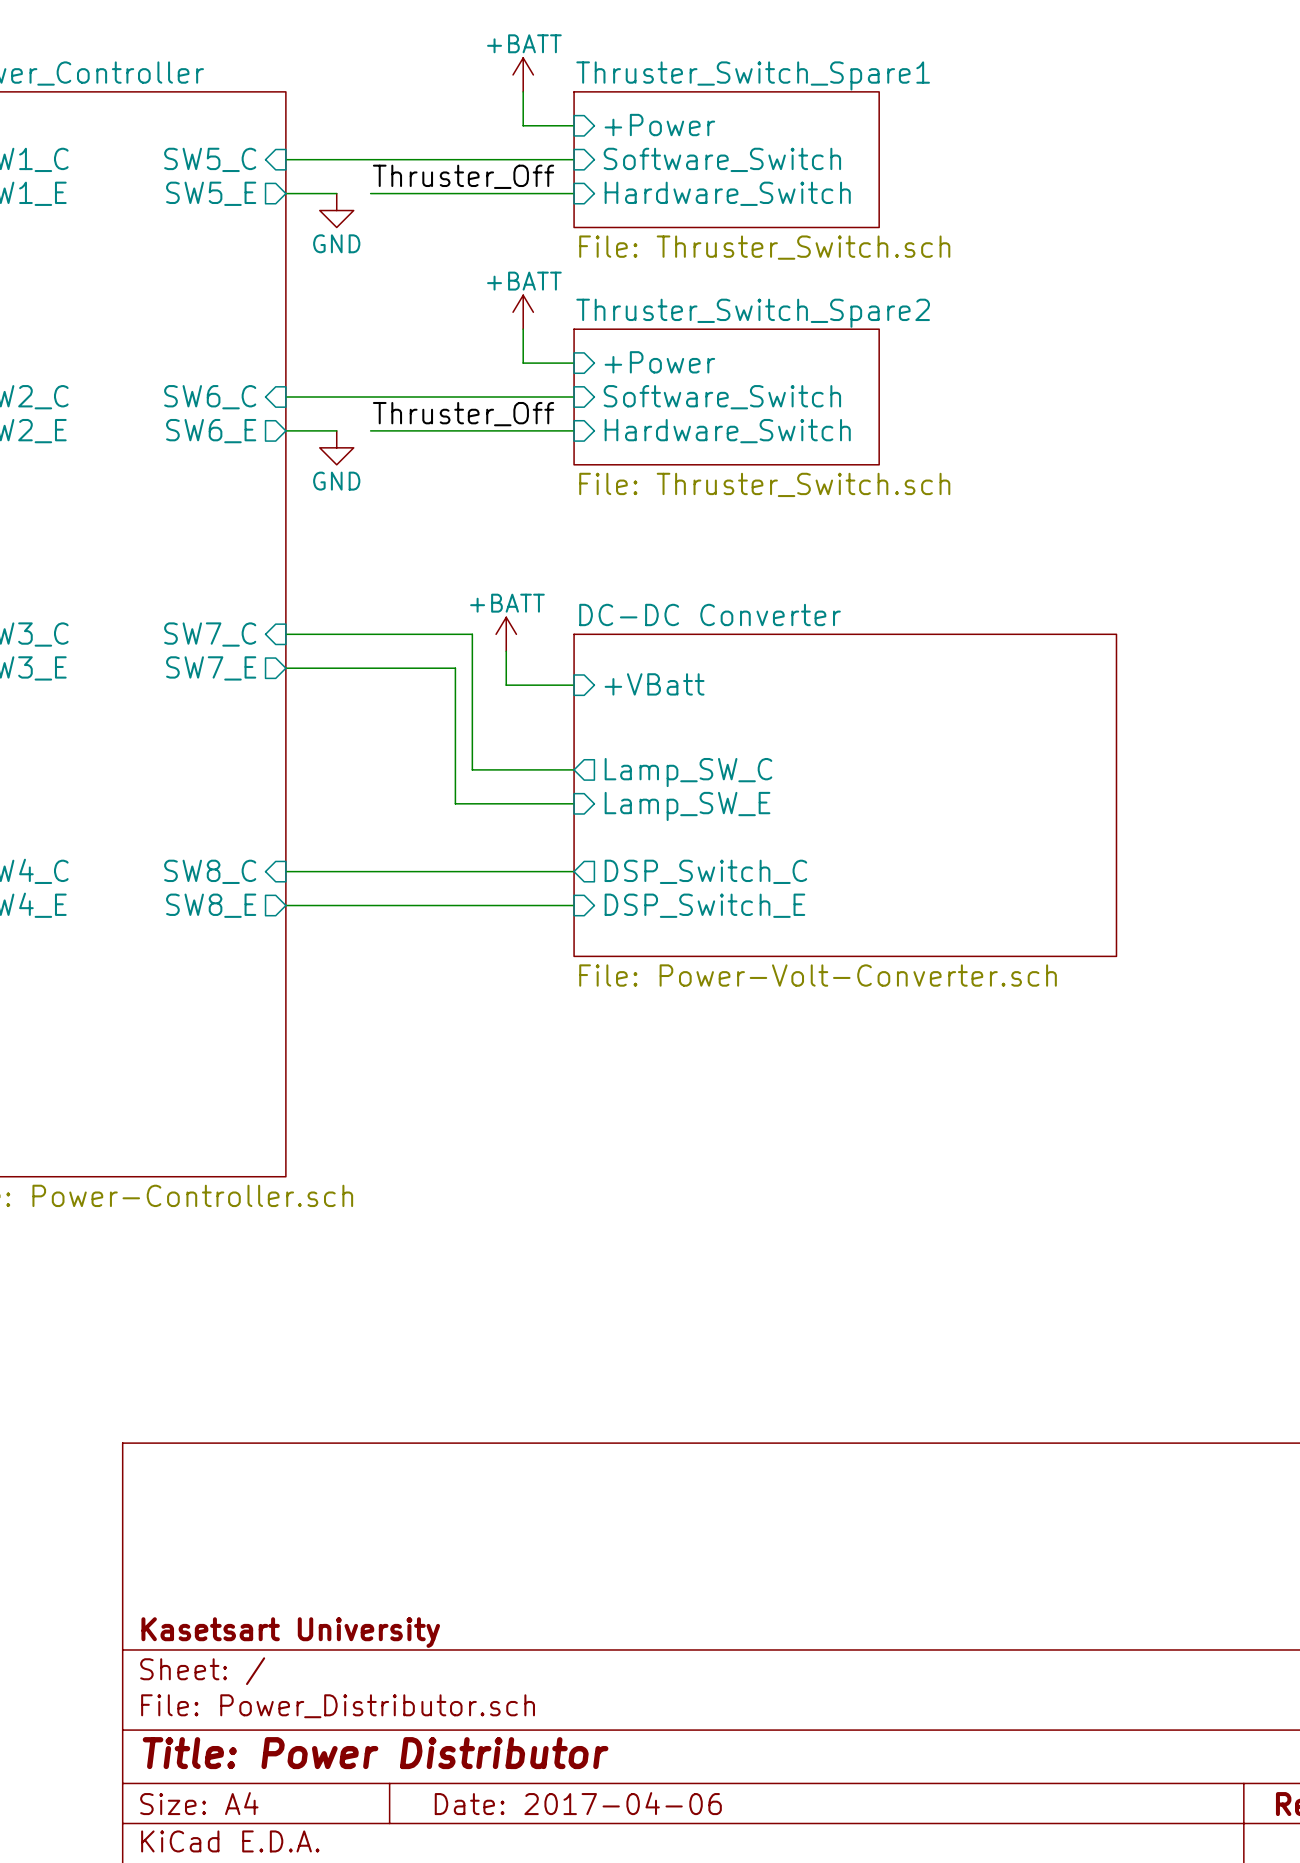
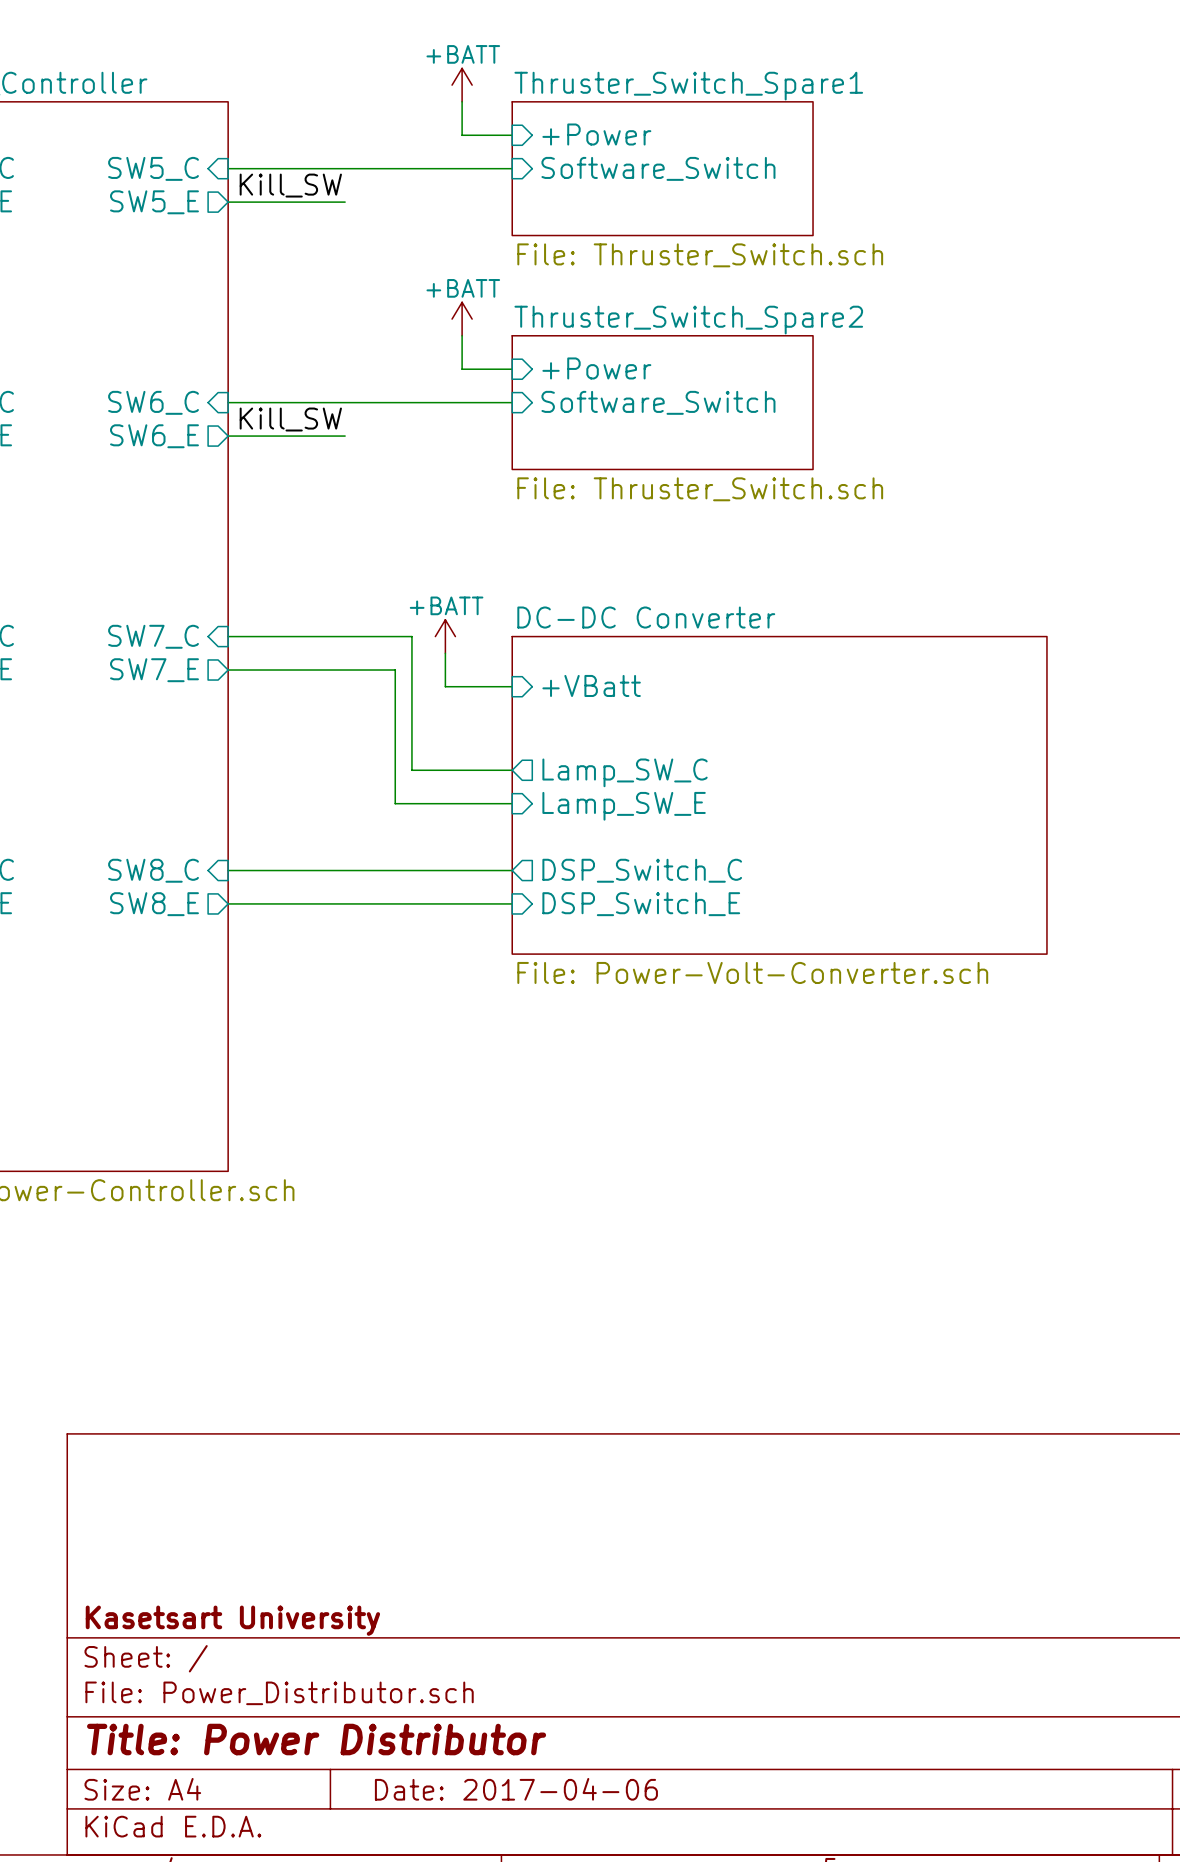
label: none -> Kill_SW (290, 185)
label: Thruster_Off (463, 176) -> none
wire: none -> (278, 202) (311, 202)
wire: (404, 193) (574, 193) -> none
sheet pin: Hardware_Switch (727, 193) -> none
power symbol: GND (336, 210) -> none
label: none -> Kill_SW (290, 419)
label: Thruster_Off (463, 414) -> none
wire: none -> (278, 436) (311, 436)
wire: (404, 430) (574, 430) -> none
sheet pin: Hardware_Switch (727, 431) -> none
power symbol: GND (336, 447) -> none

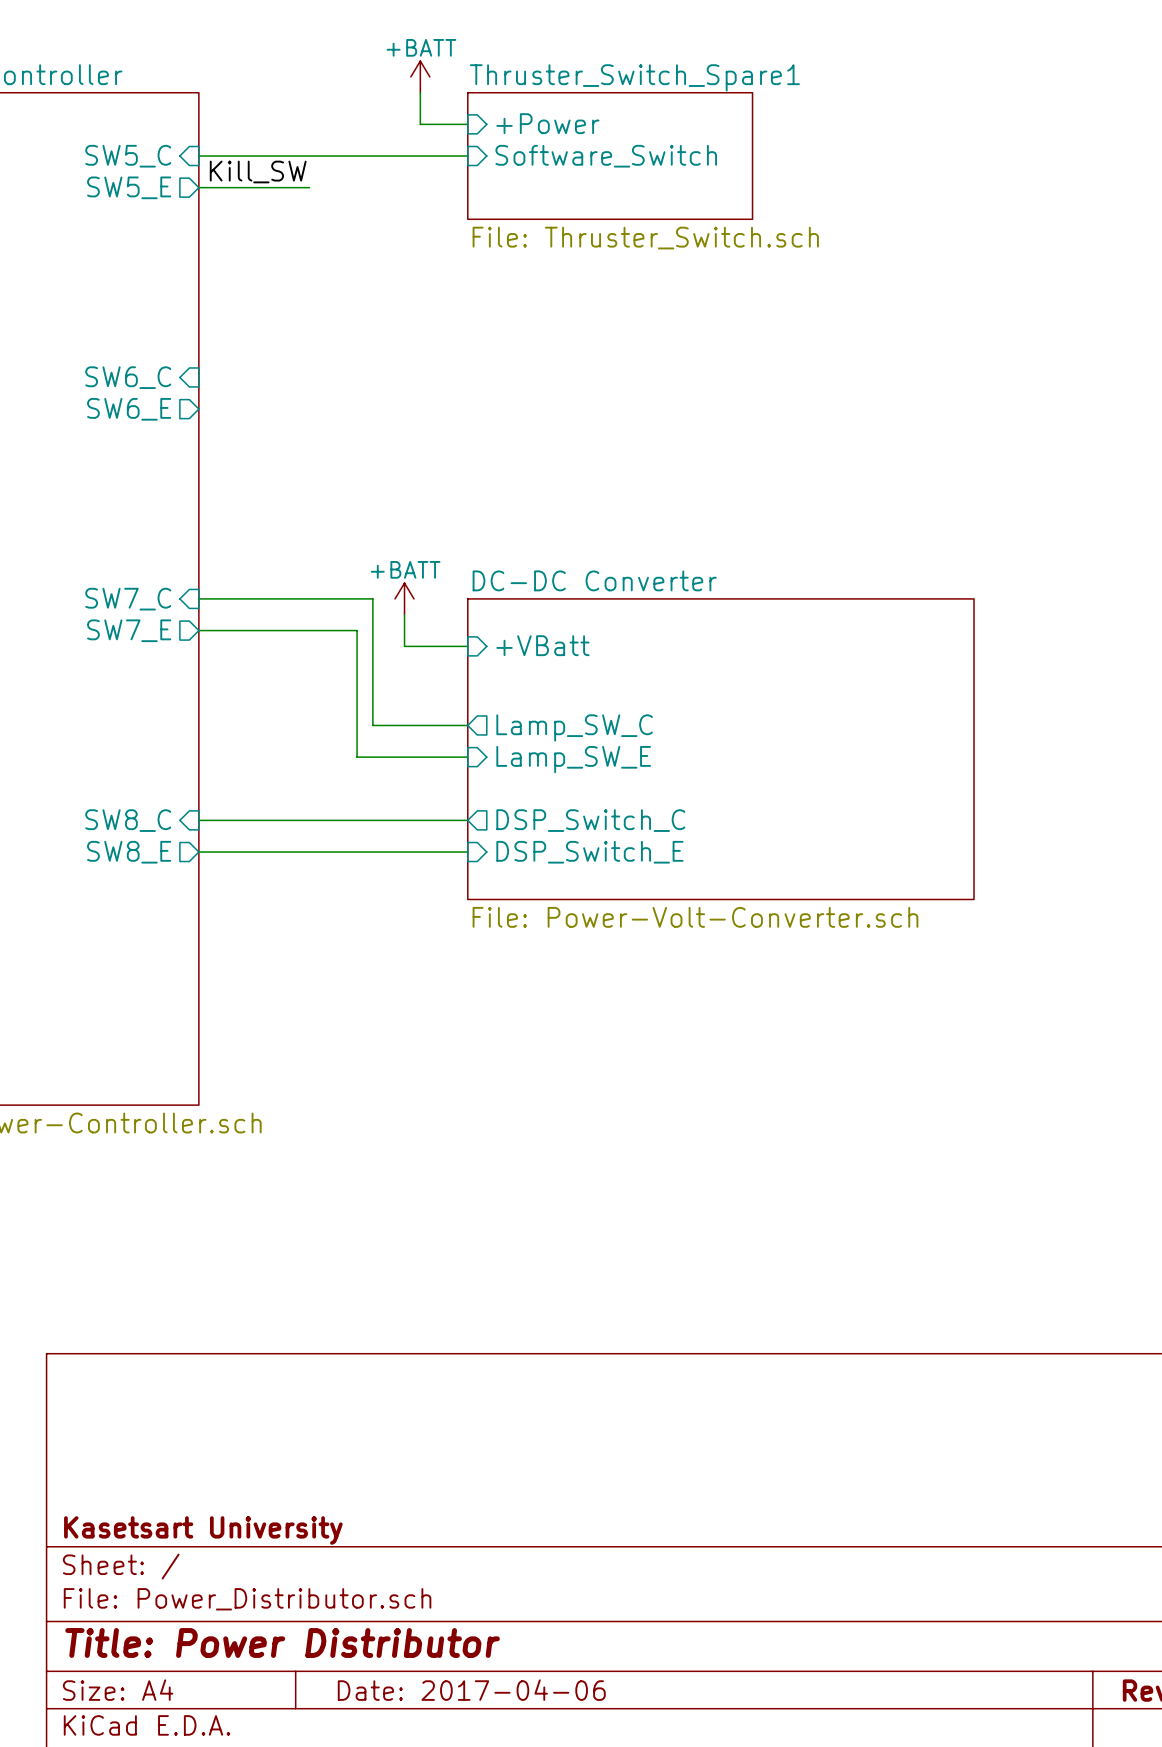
power symbol: +BATT (462, 319) -> none
wire: (462, 335) (462, 369) (512, 369) -> none
sheet pin: +Power (596, 368) -> none
wire: (228, 402) (512, 402) -> none
sheet pin: Software_Switch (658, 402) -> none
sheet Thruster_Switch_Spare2: File: Thruster_Switch.sch (662, 402) -> none
label: Kill_SW (290, 419) -> none
wire: (228, 436) (345, 436) -> none

